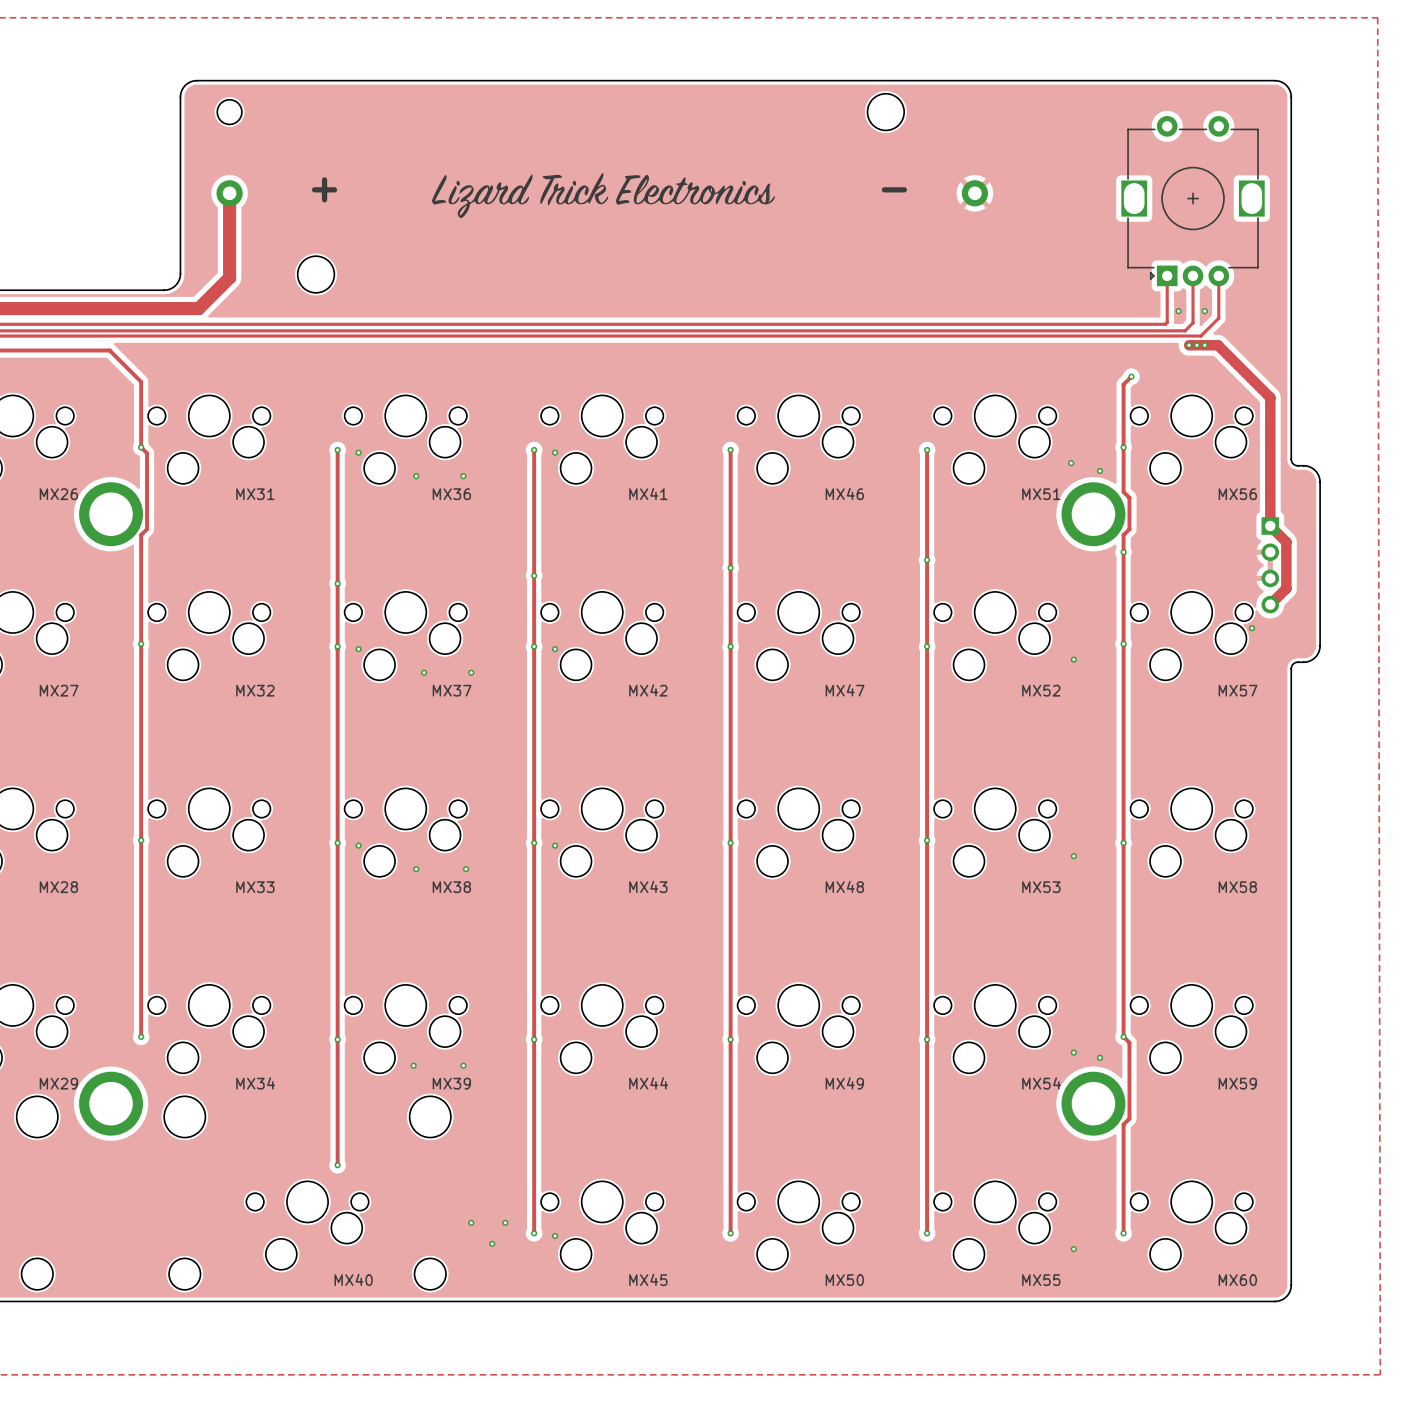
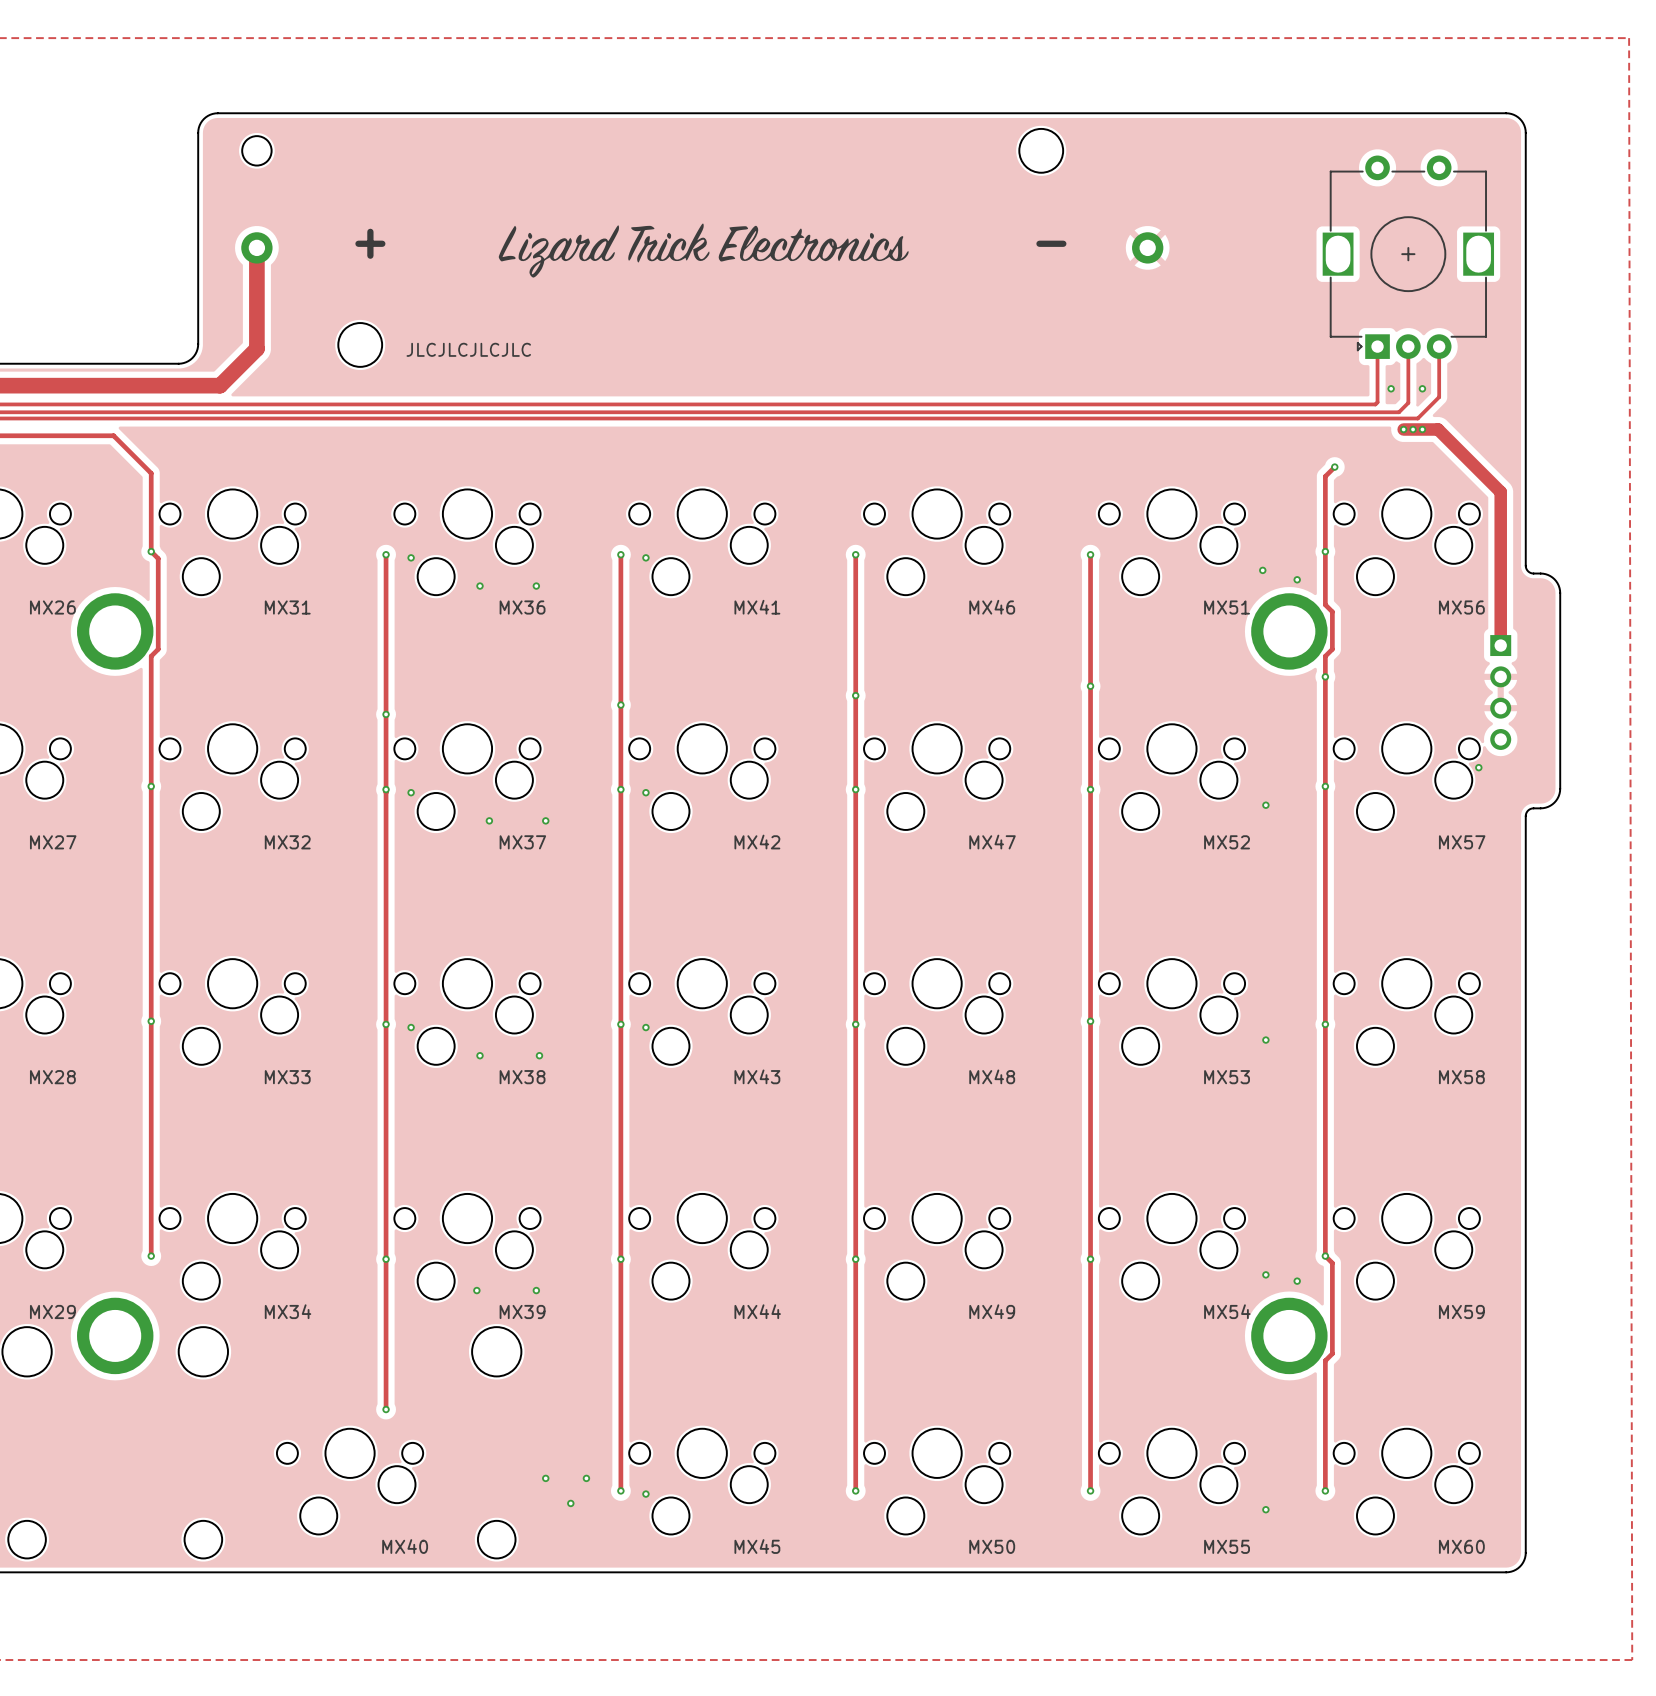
text: none -> JLCJLCJLCJLC (468, 349)
track: (1270, 526) (1286, 542) (1286, 588) (1270, 604) -> none

